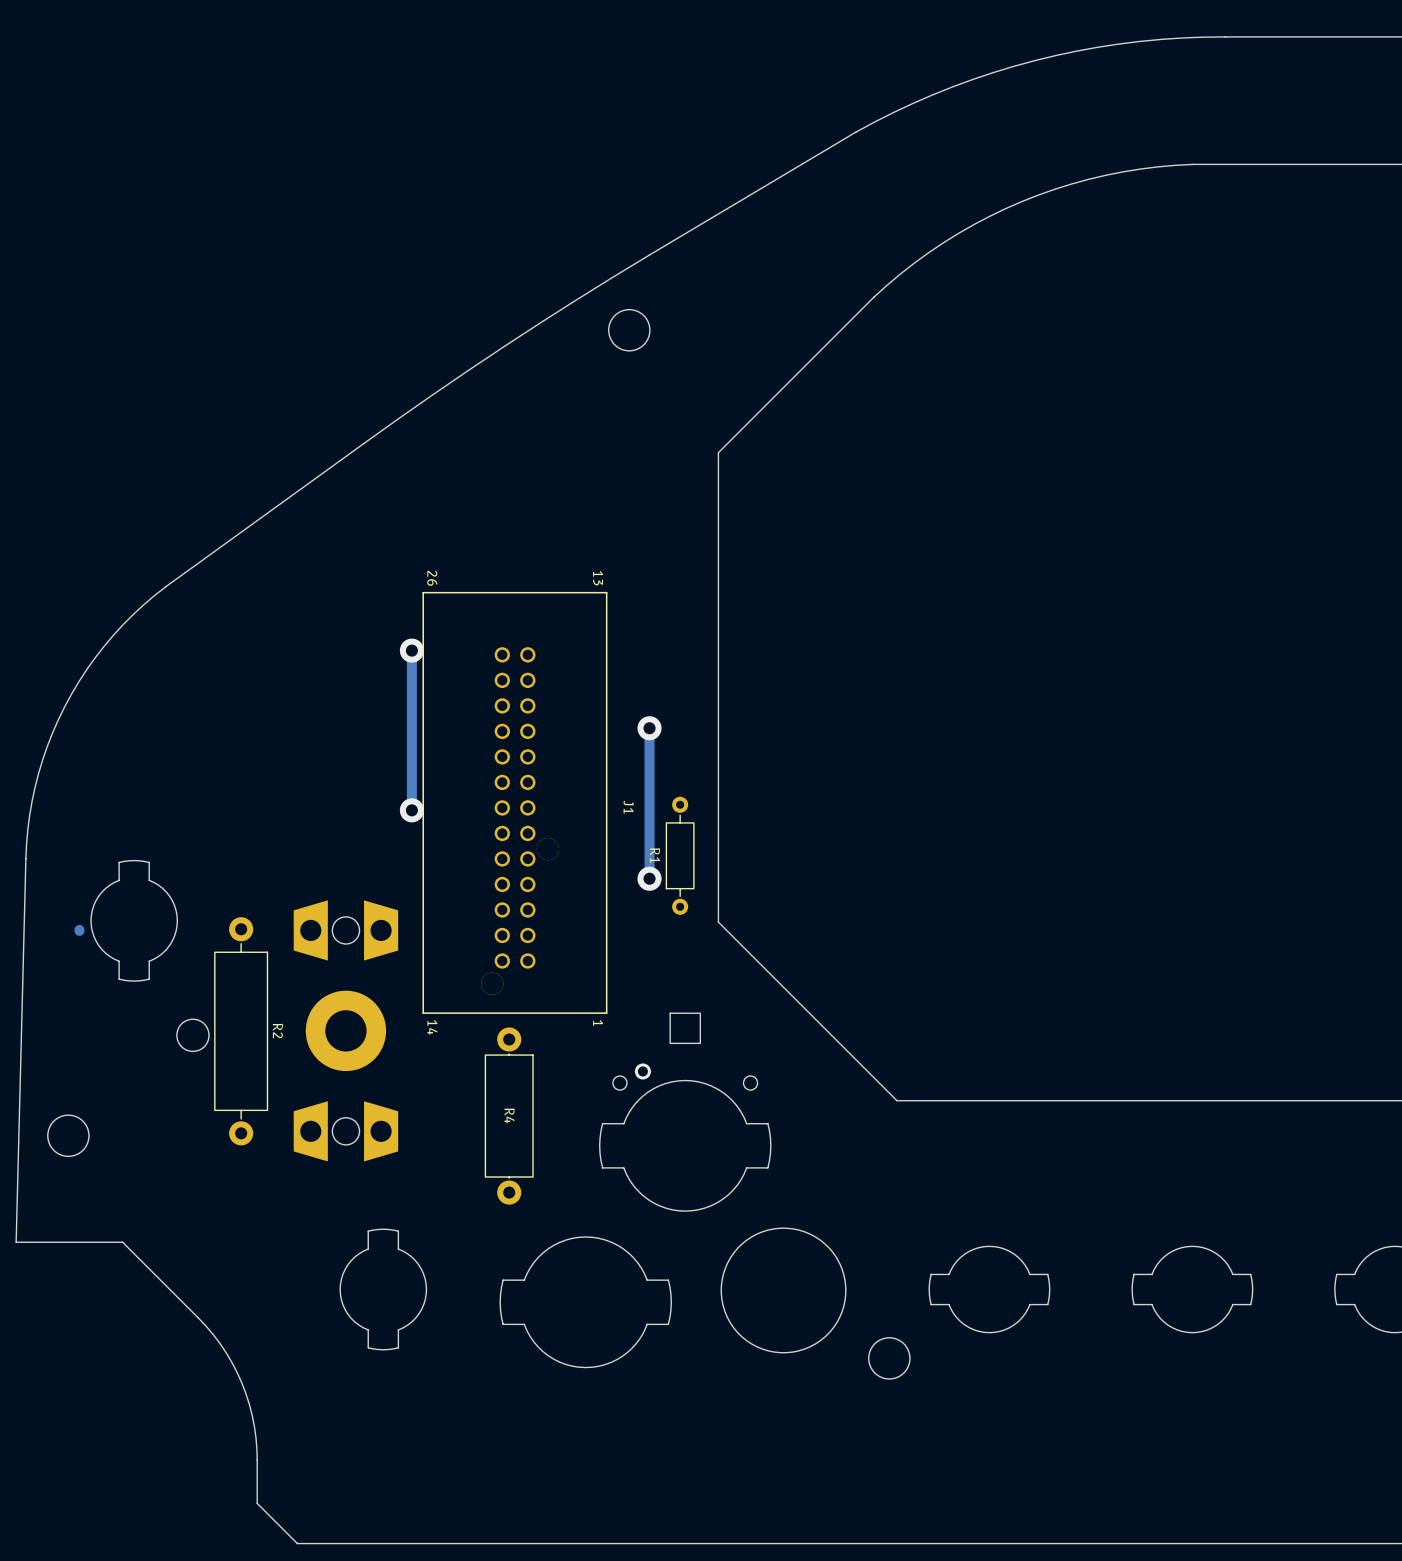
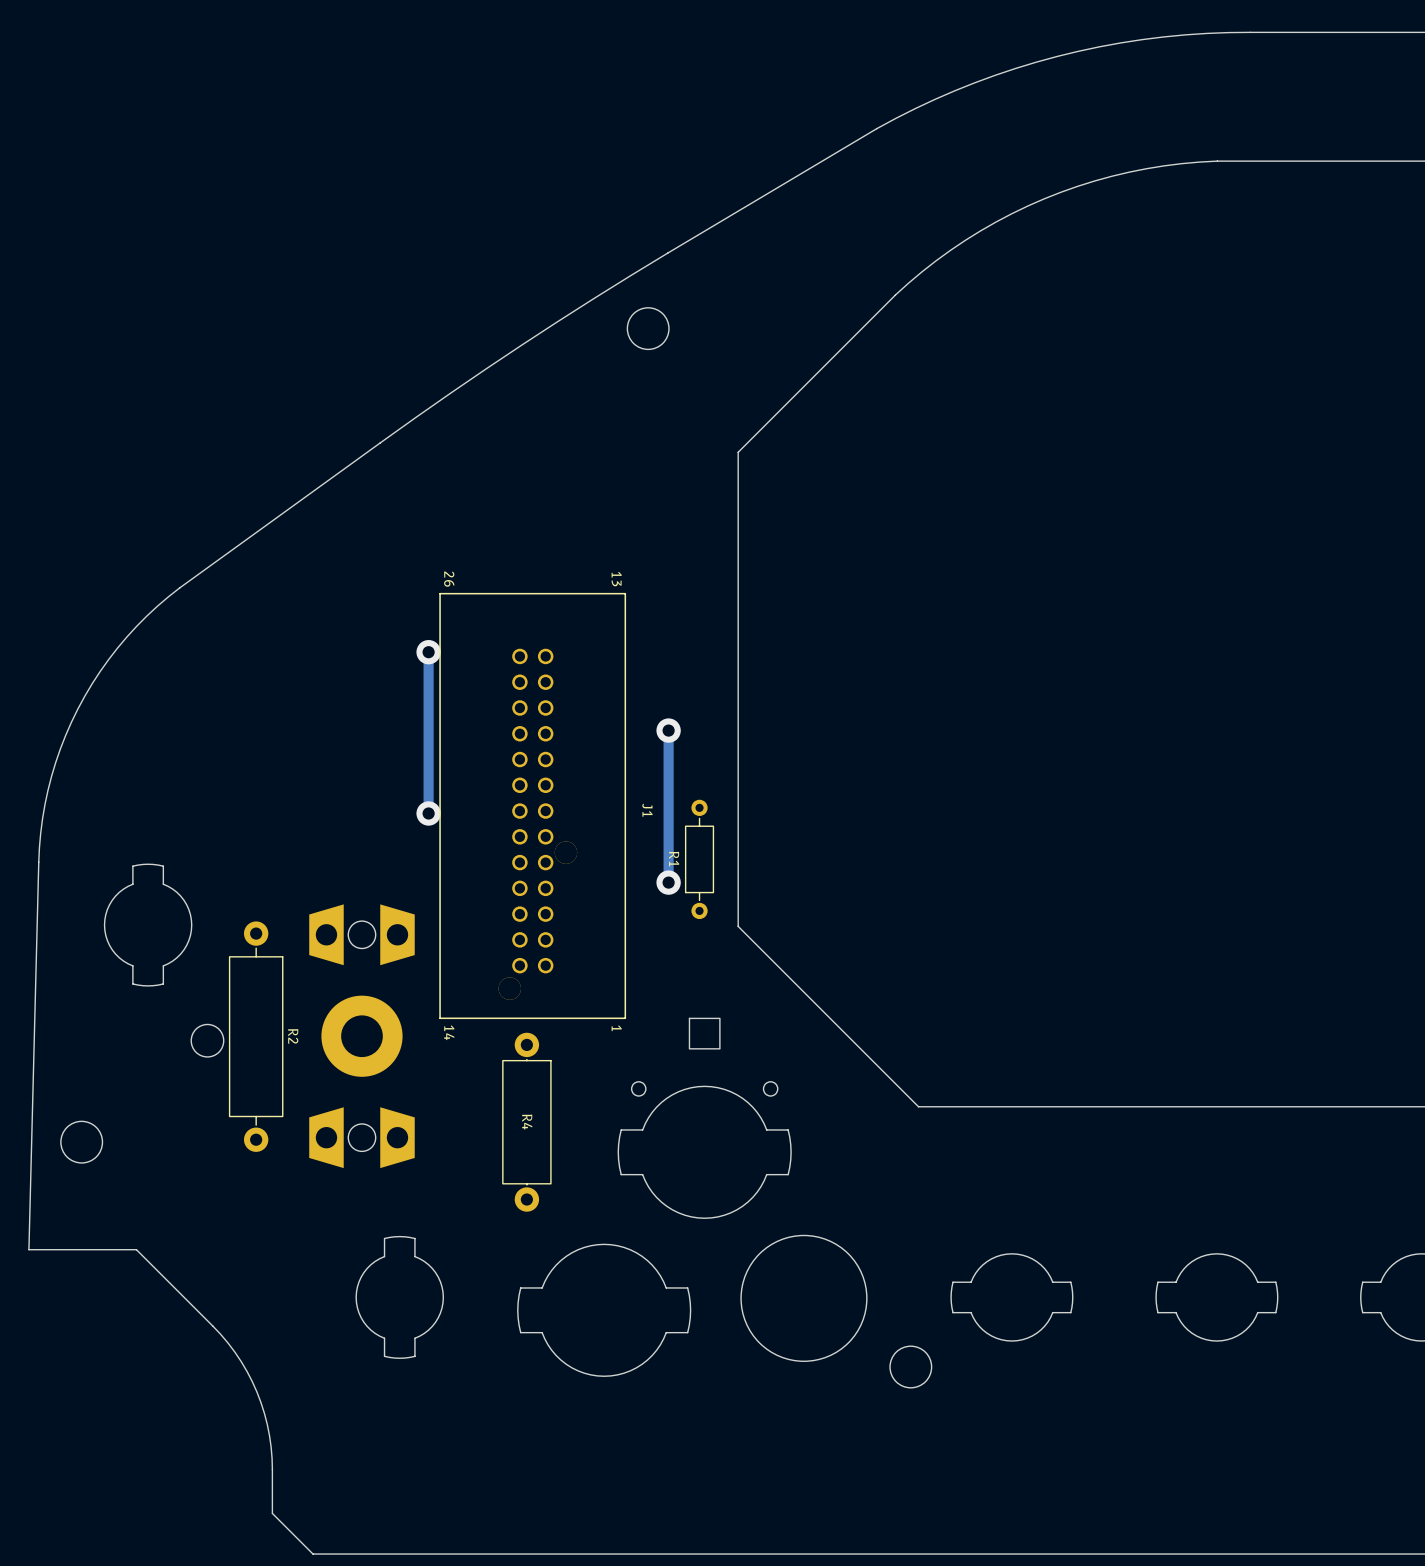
track: (79, 929) (79, 930) -> none
via: (642, 1071) -> none

